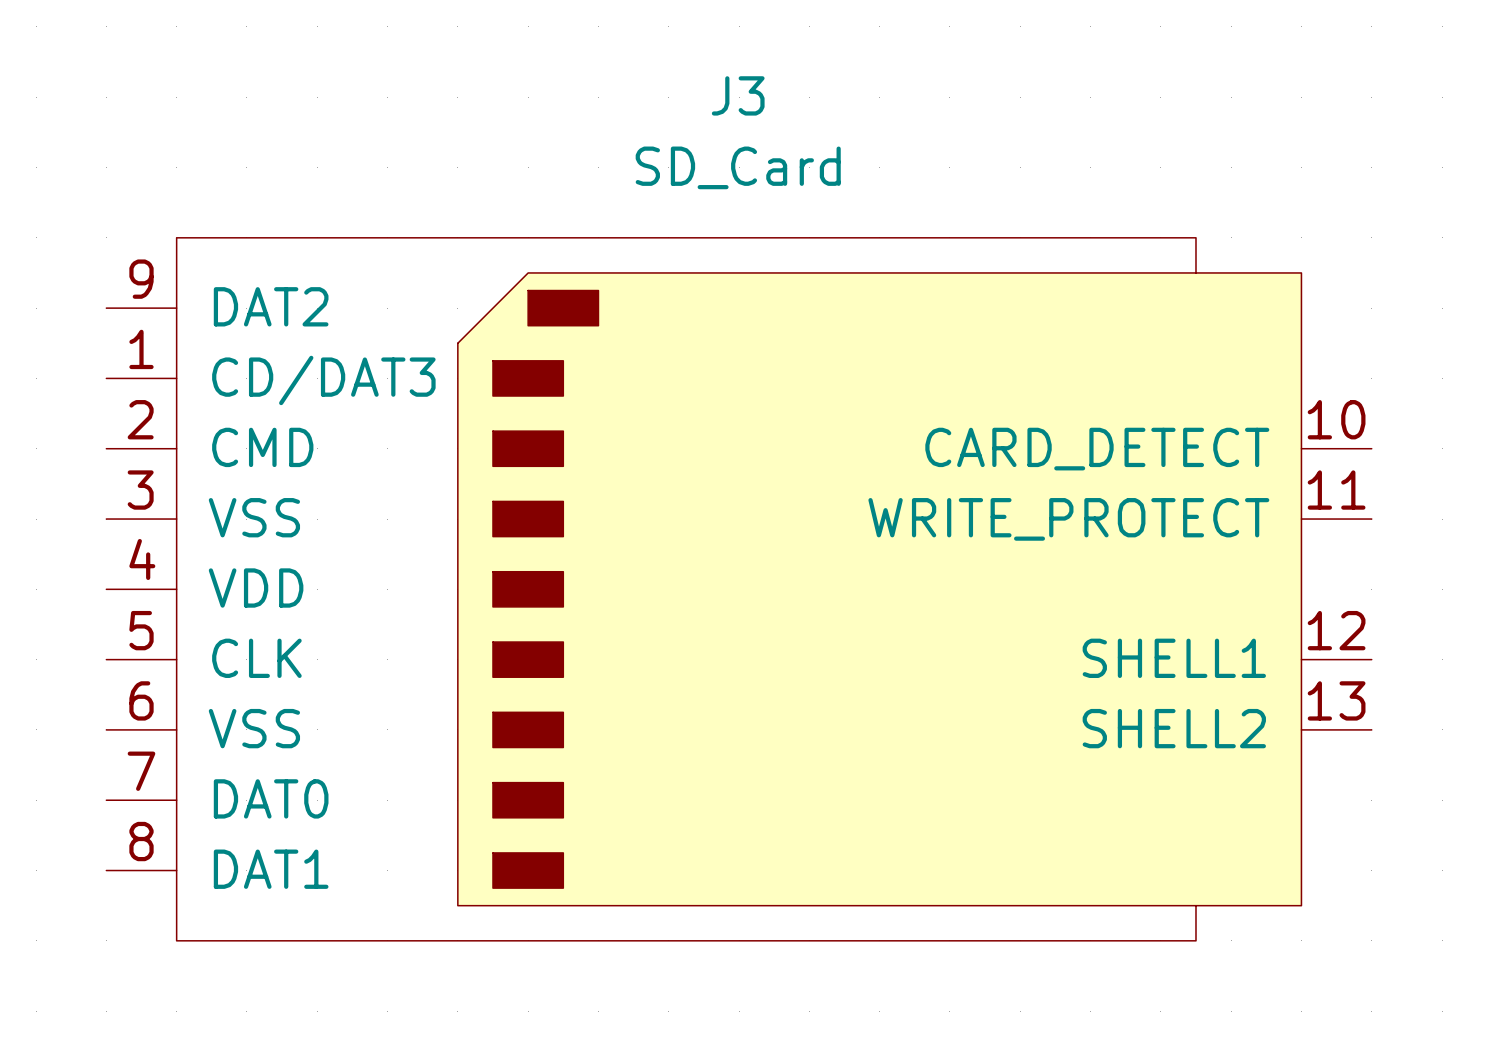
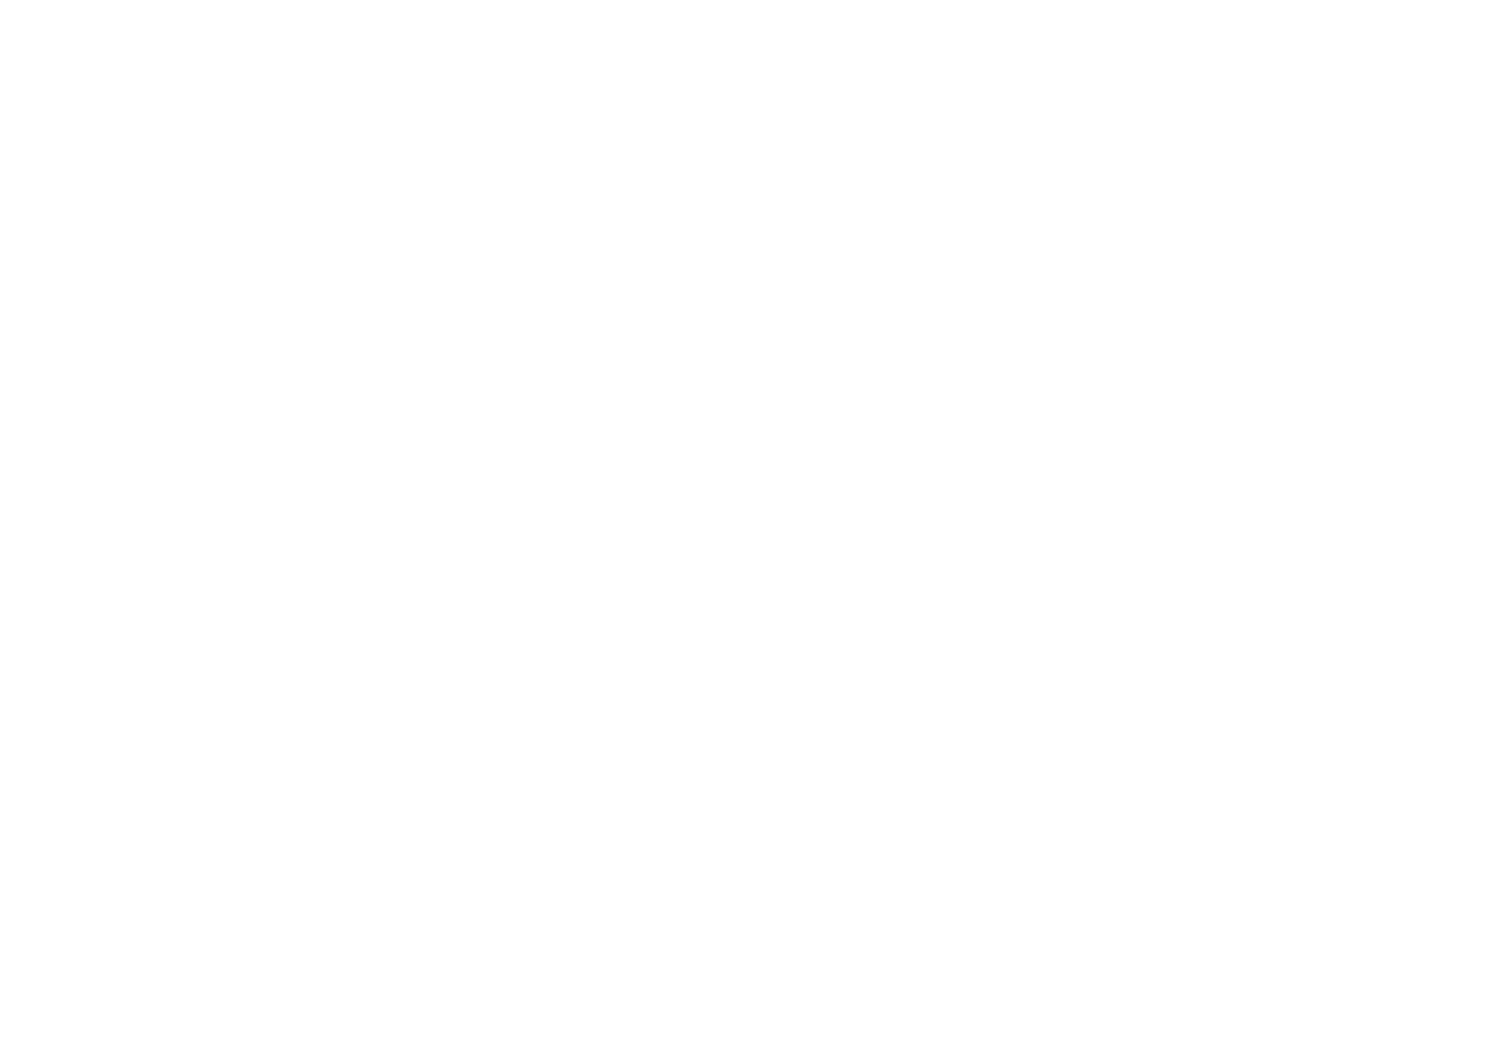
J3: SD_Card (739, 589) -> none

